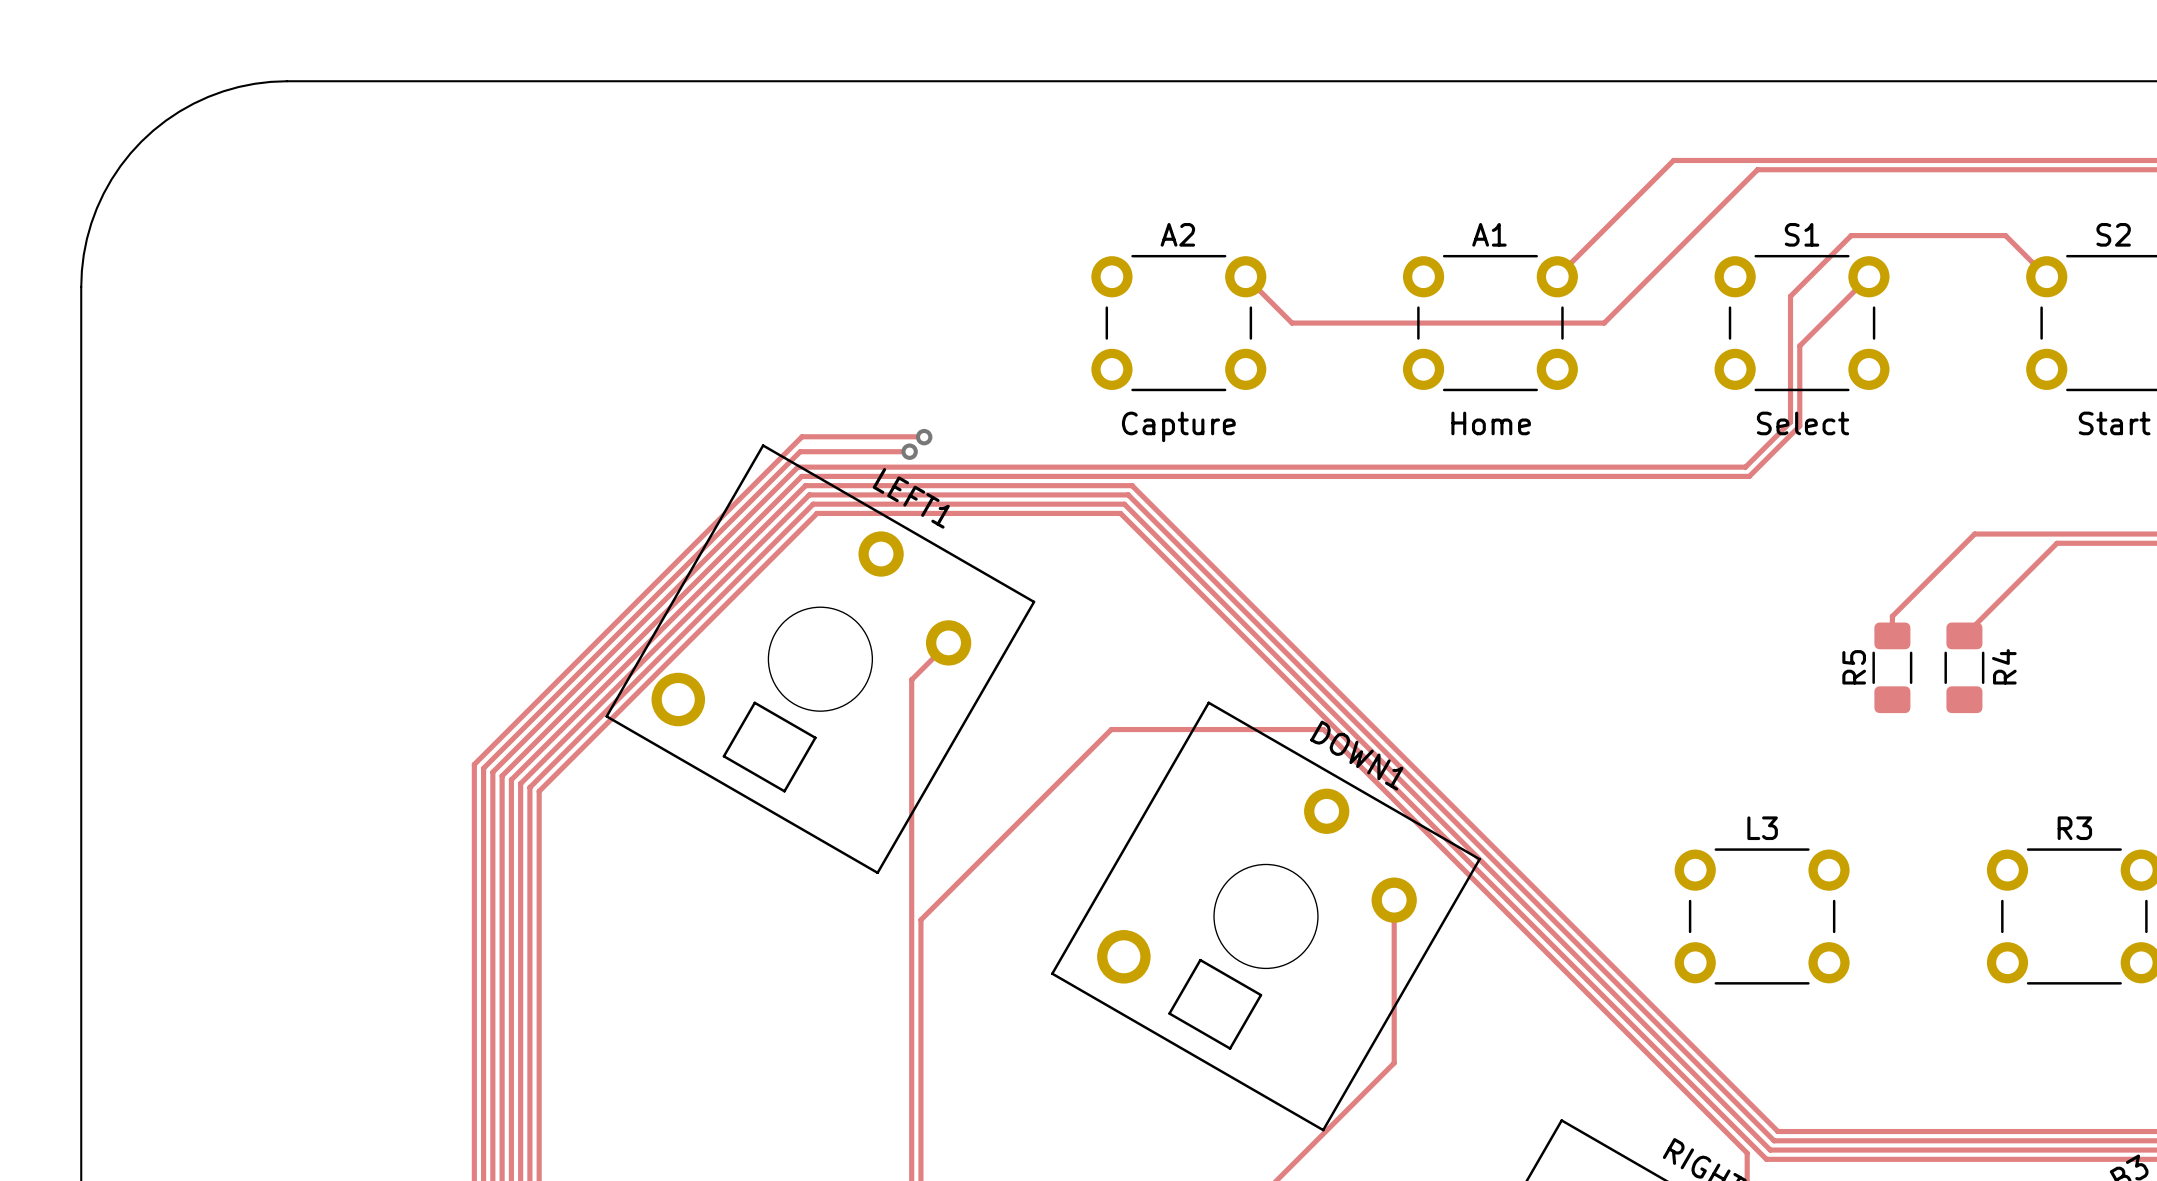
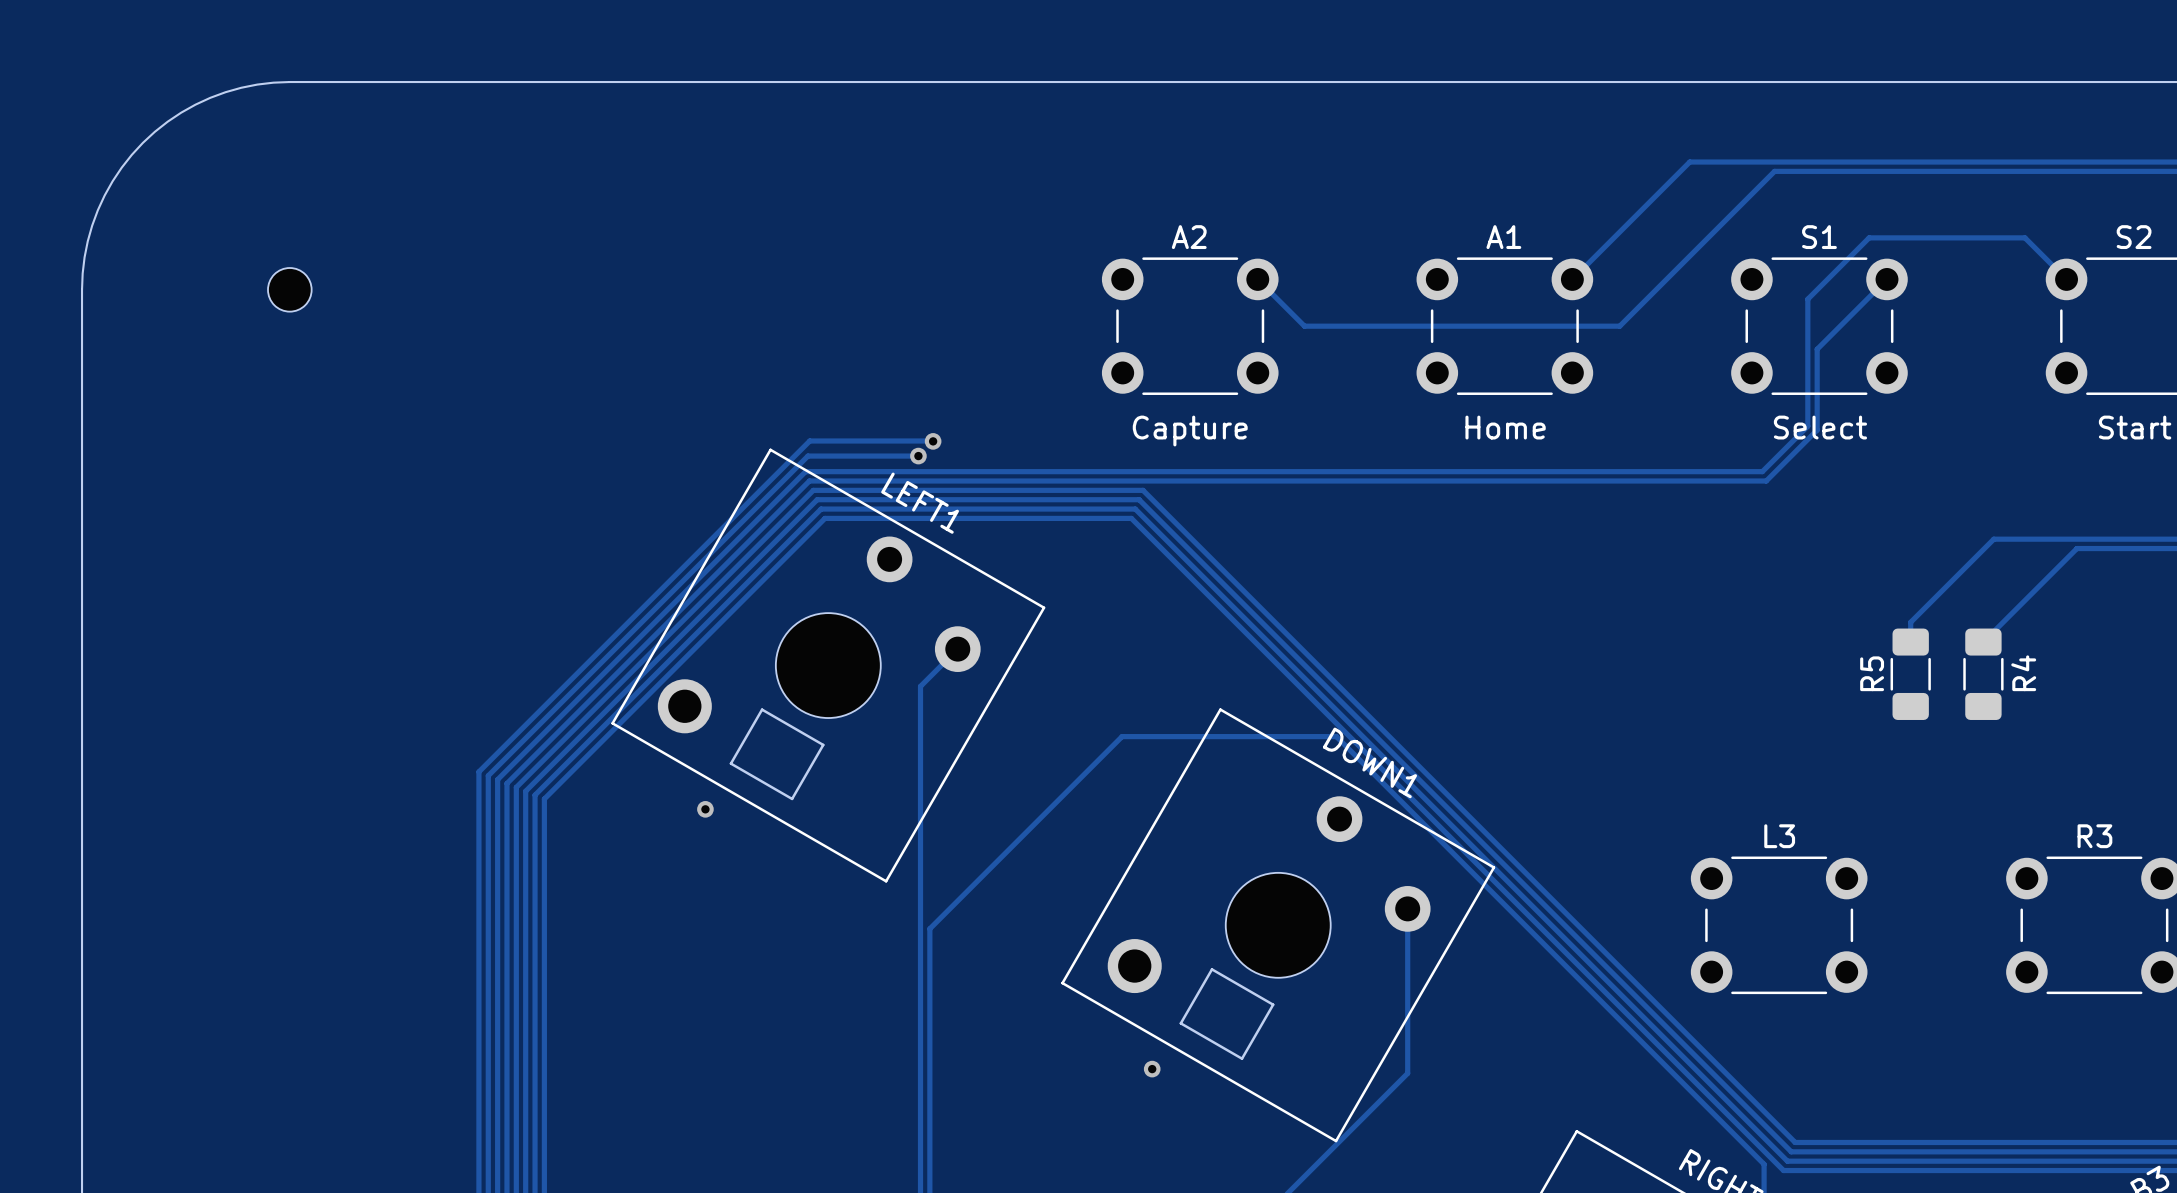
part: none -> (289, 289)
via: none -> (705, 809)
via: none -> (1152, 1069)

